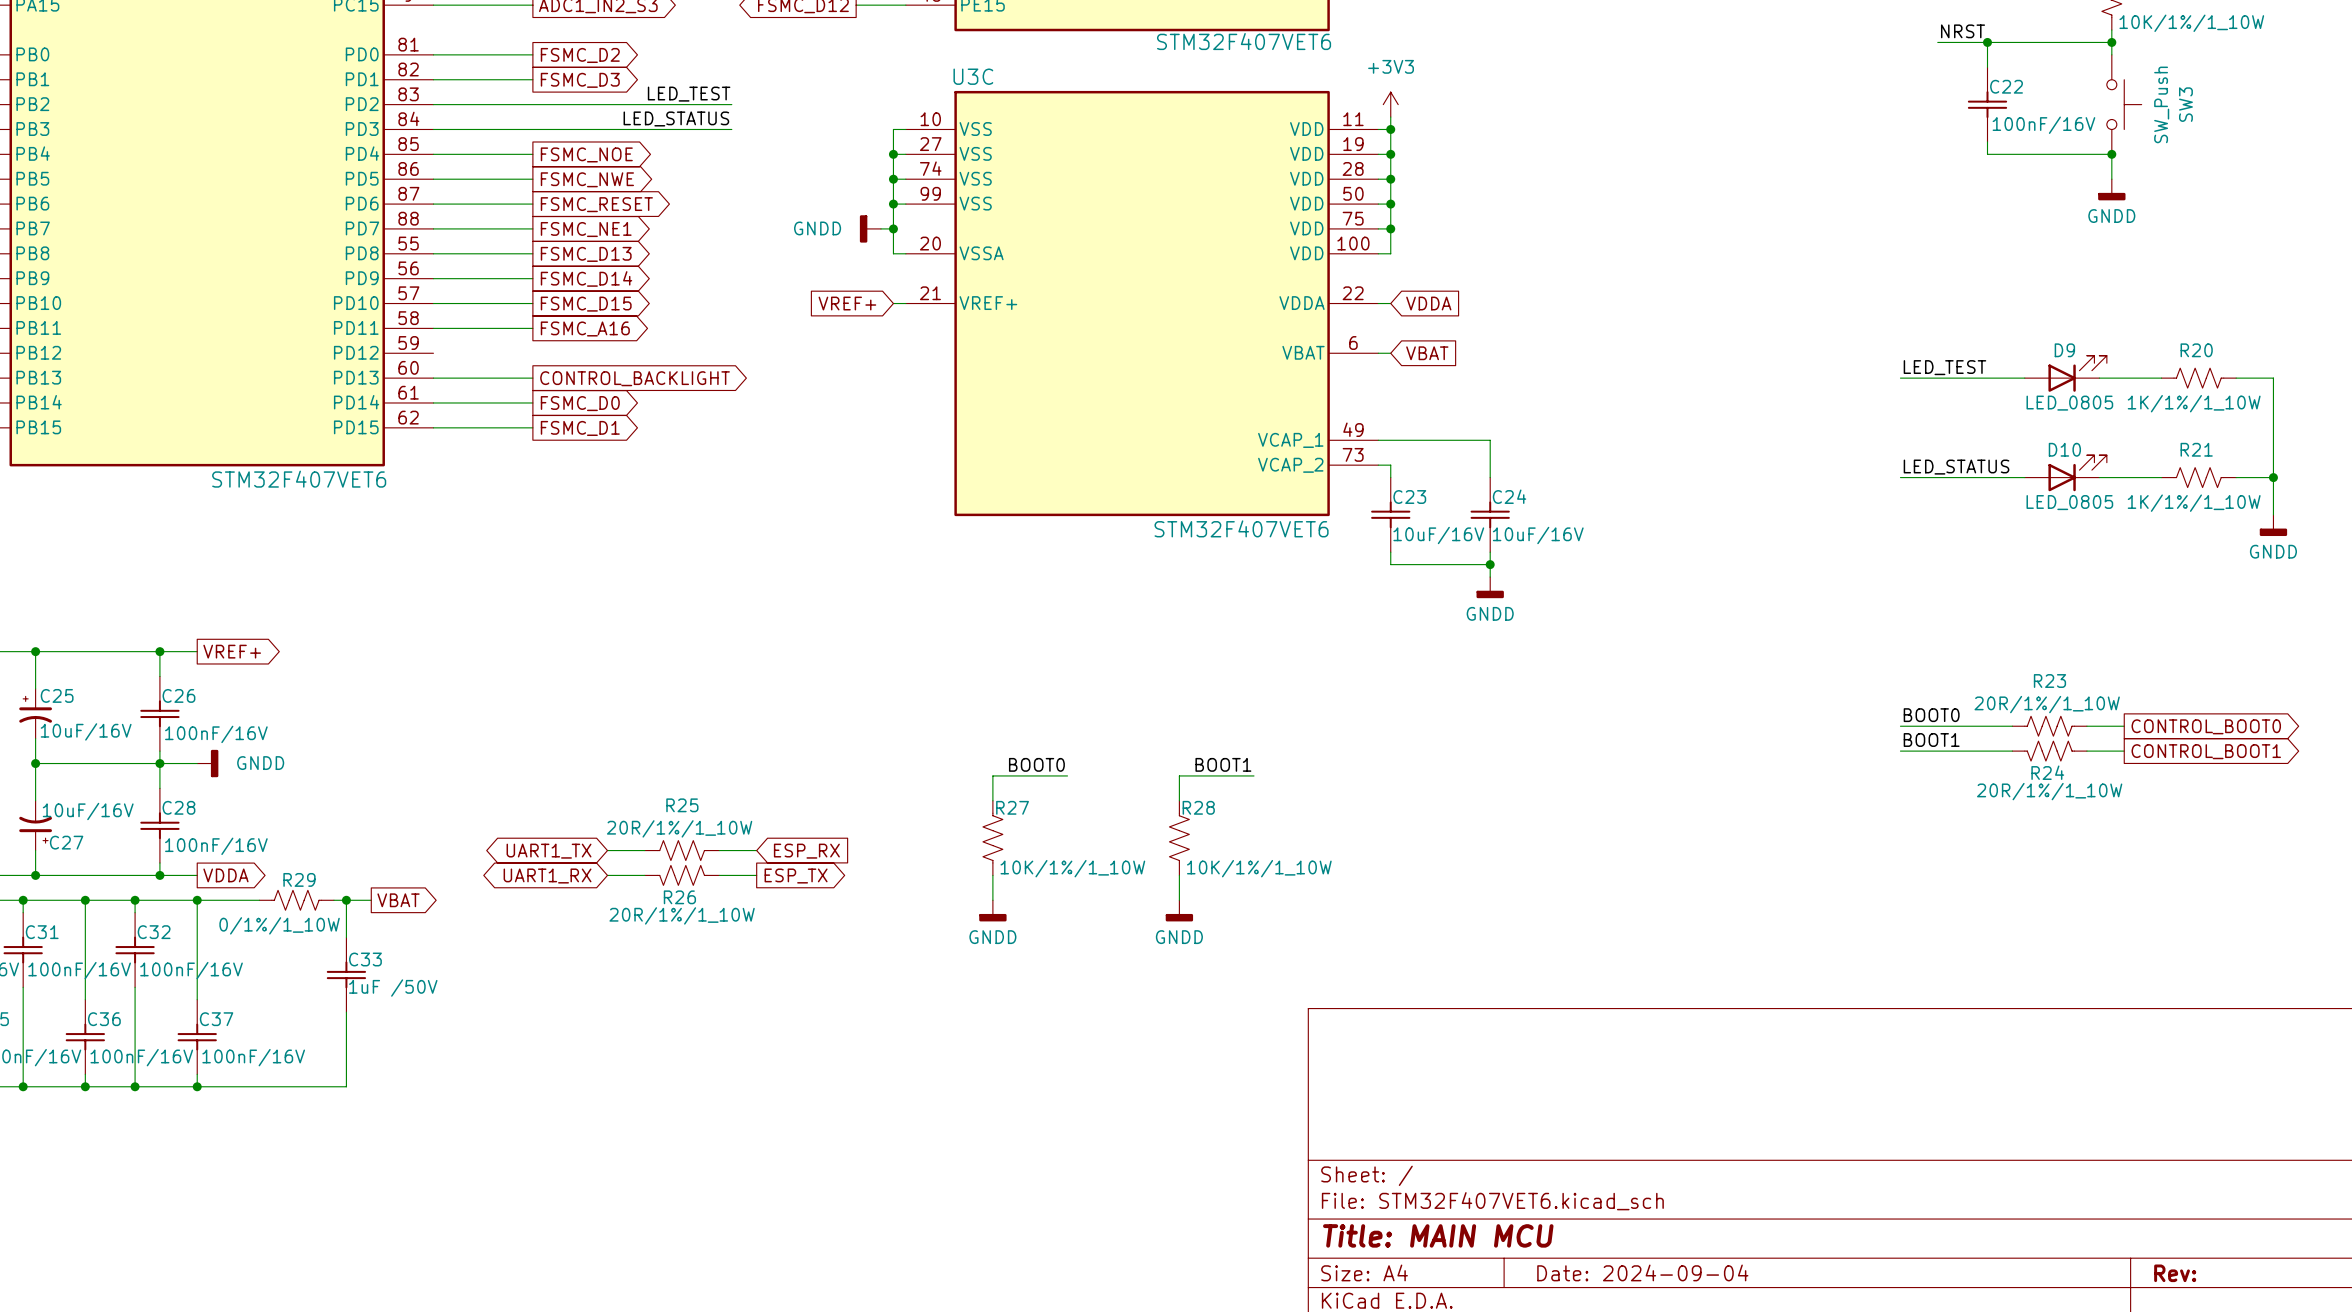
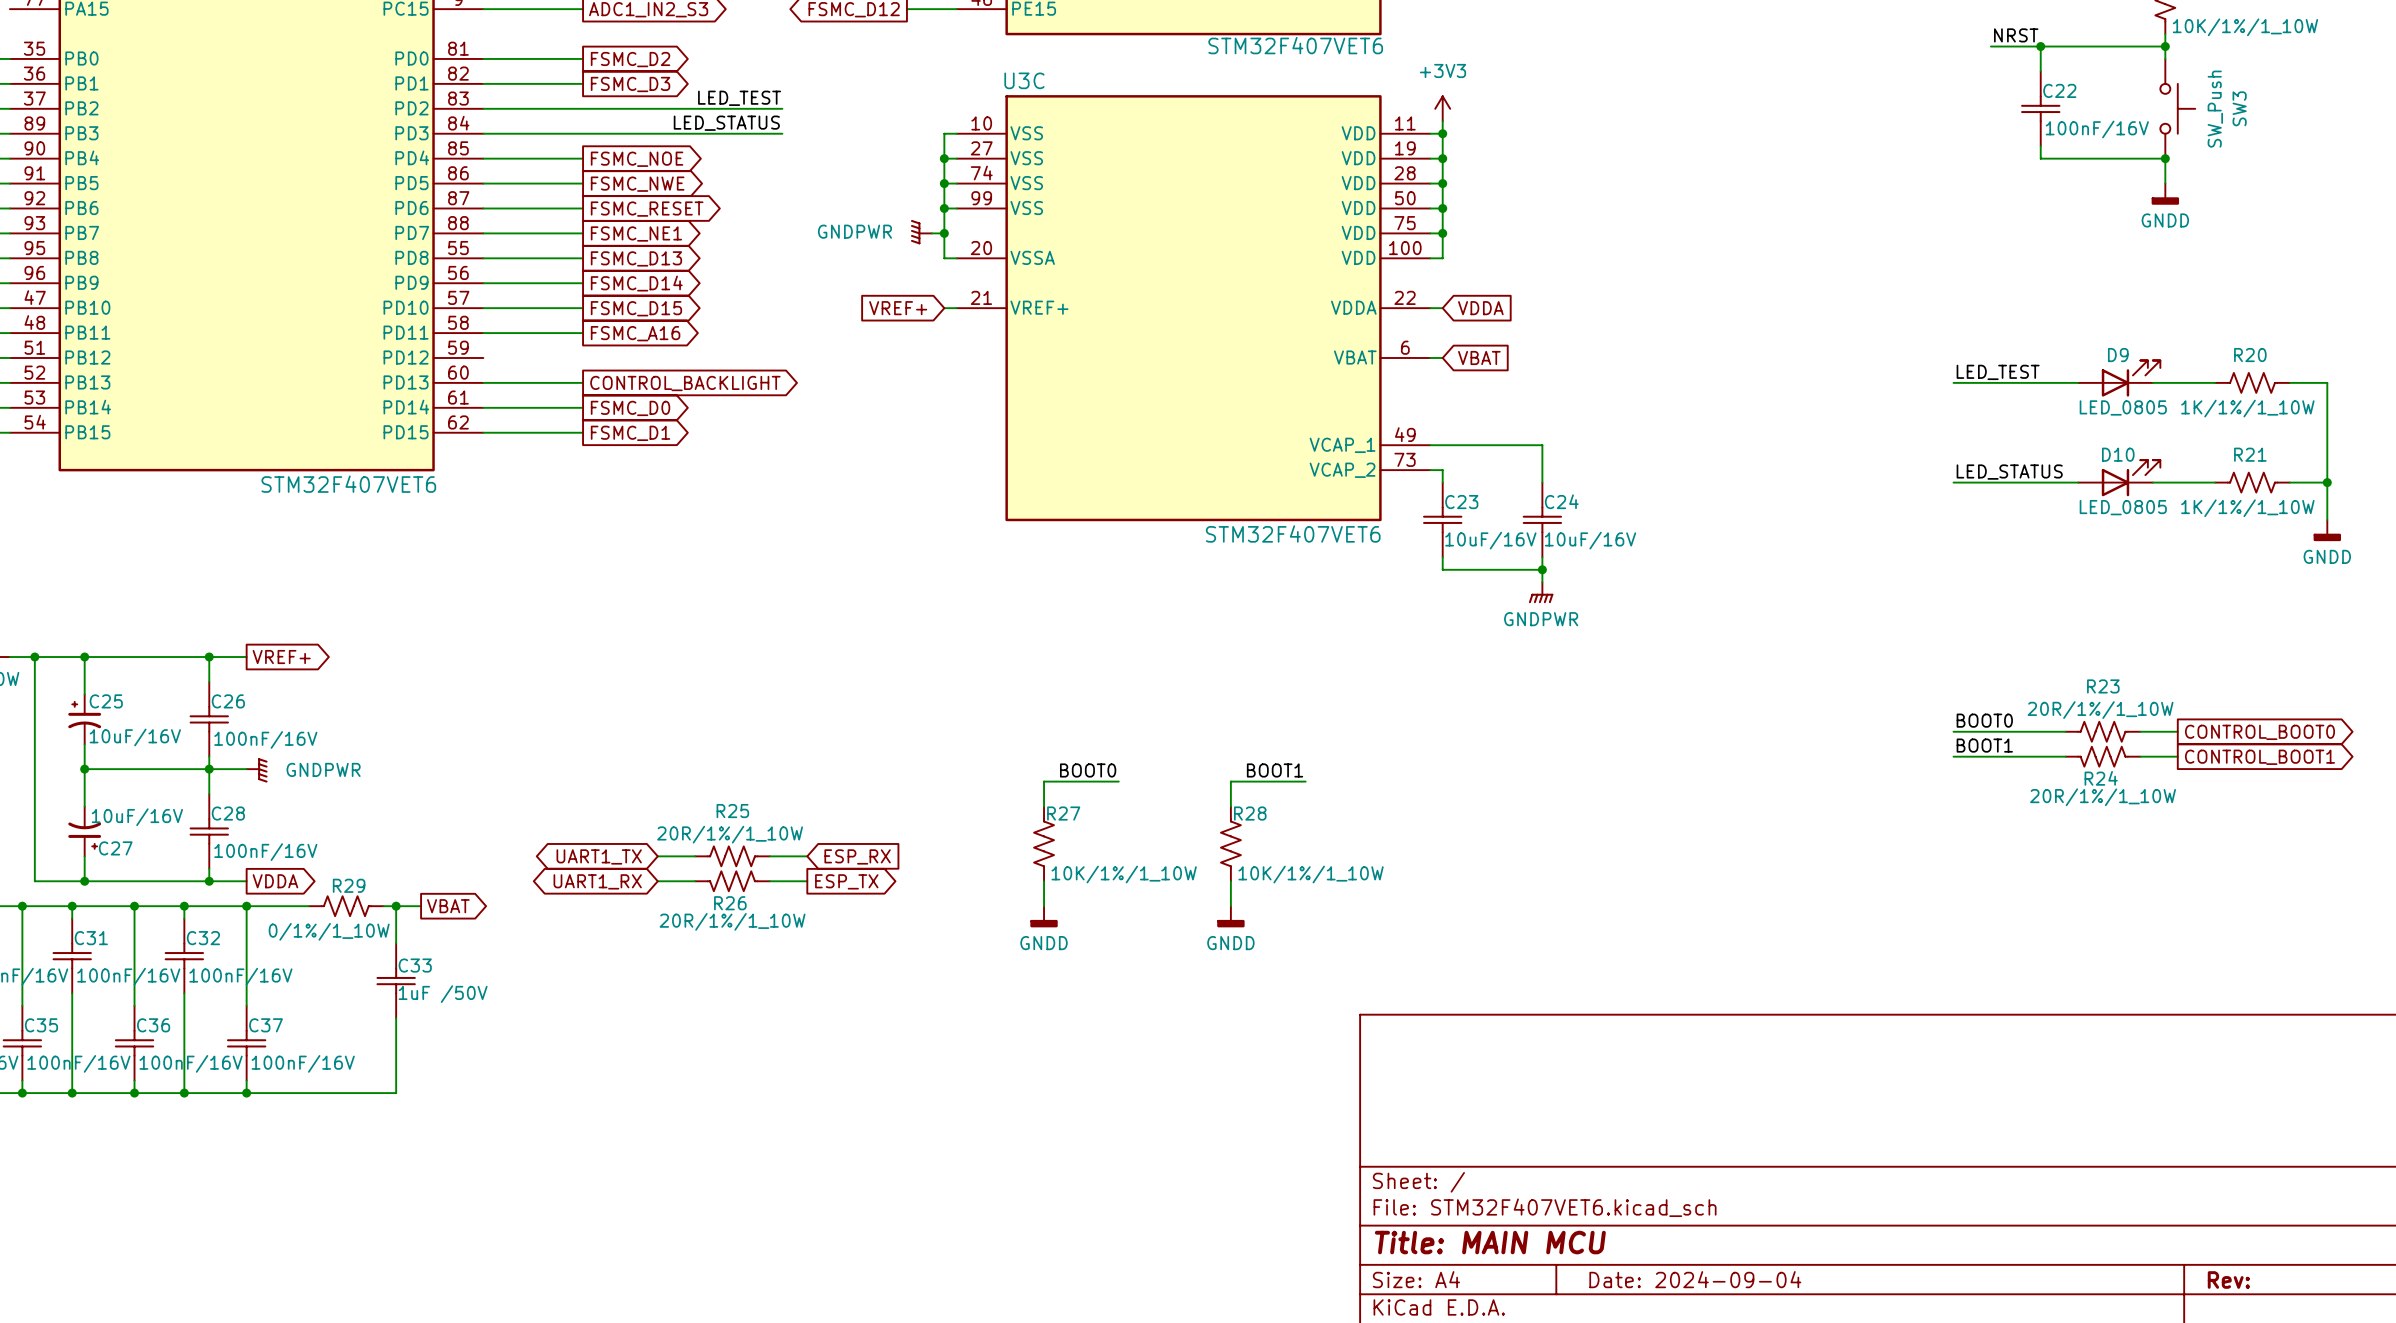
power symbol: GNDD (870, 228) -> GNDPWR (921, 232)
power symbol: GNDD (1490, 587) -> GNDPWR (1541, 592)
power symbol: GNDD (207, 763) -> GNDPWR (257, 770)

